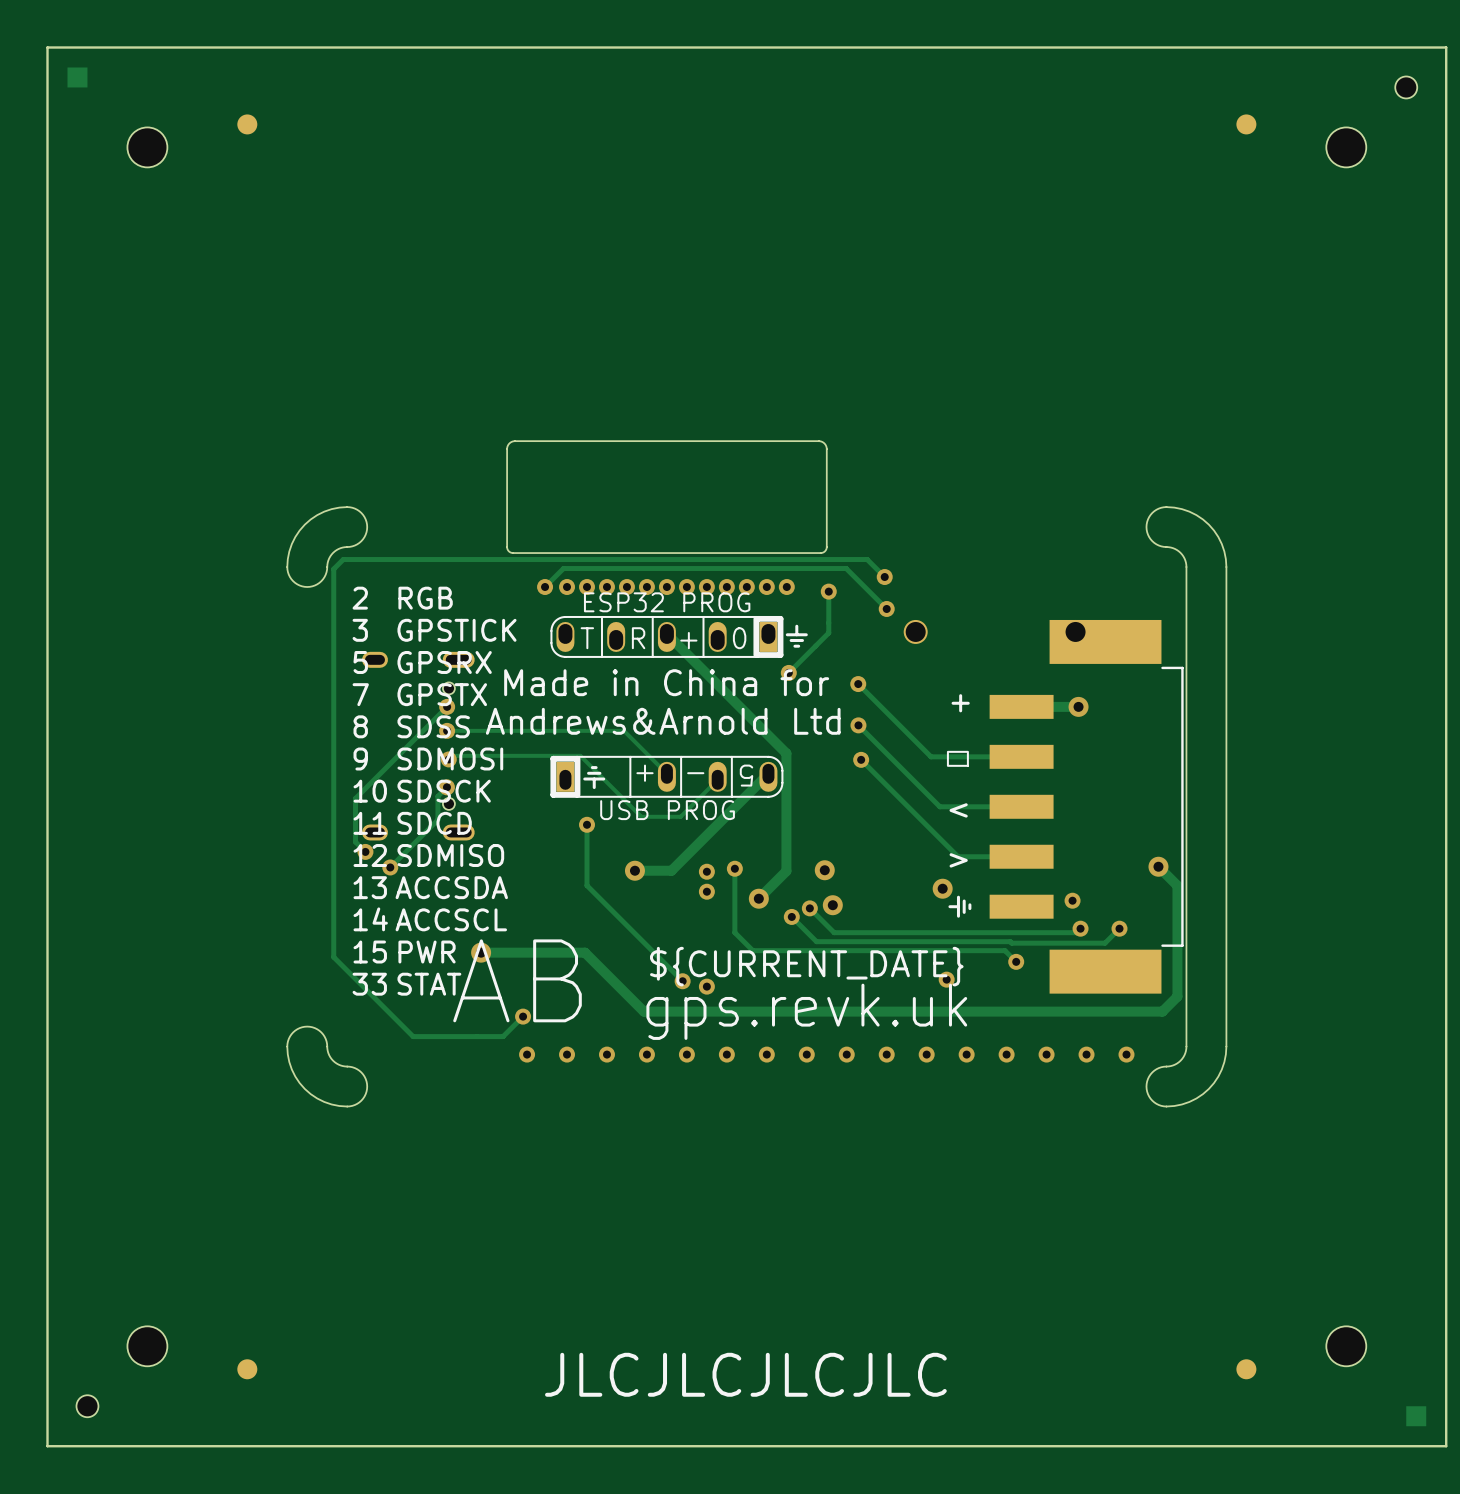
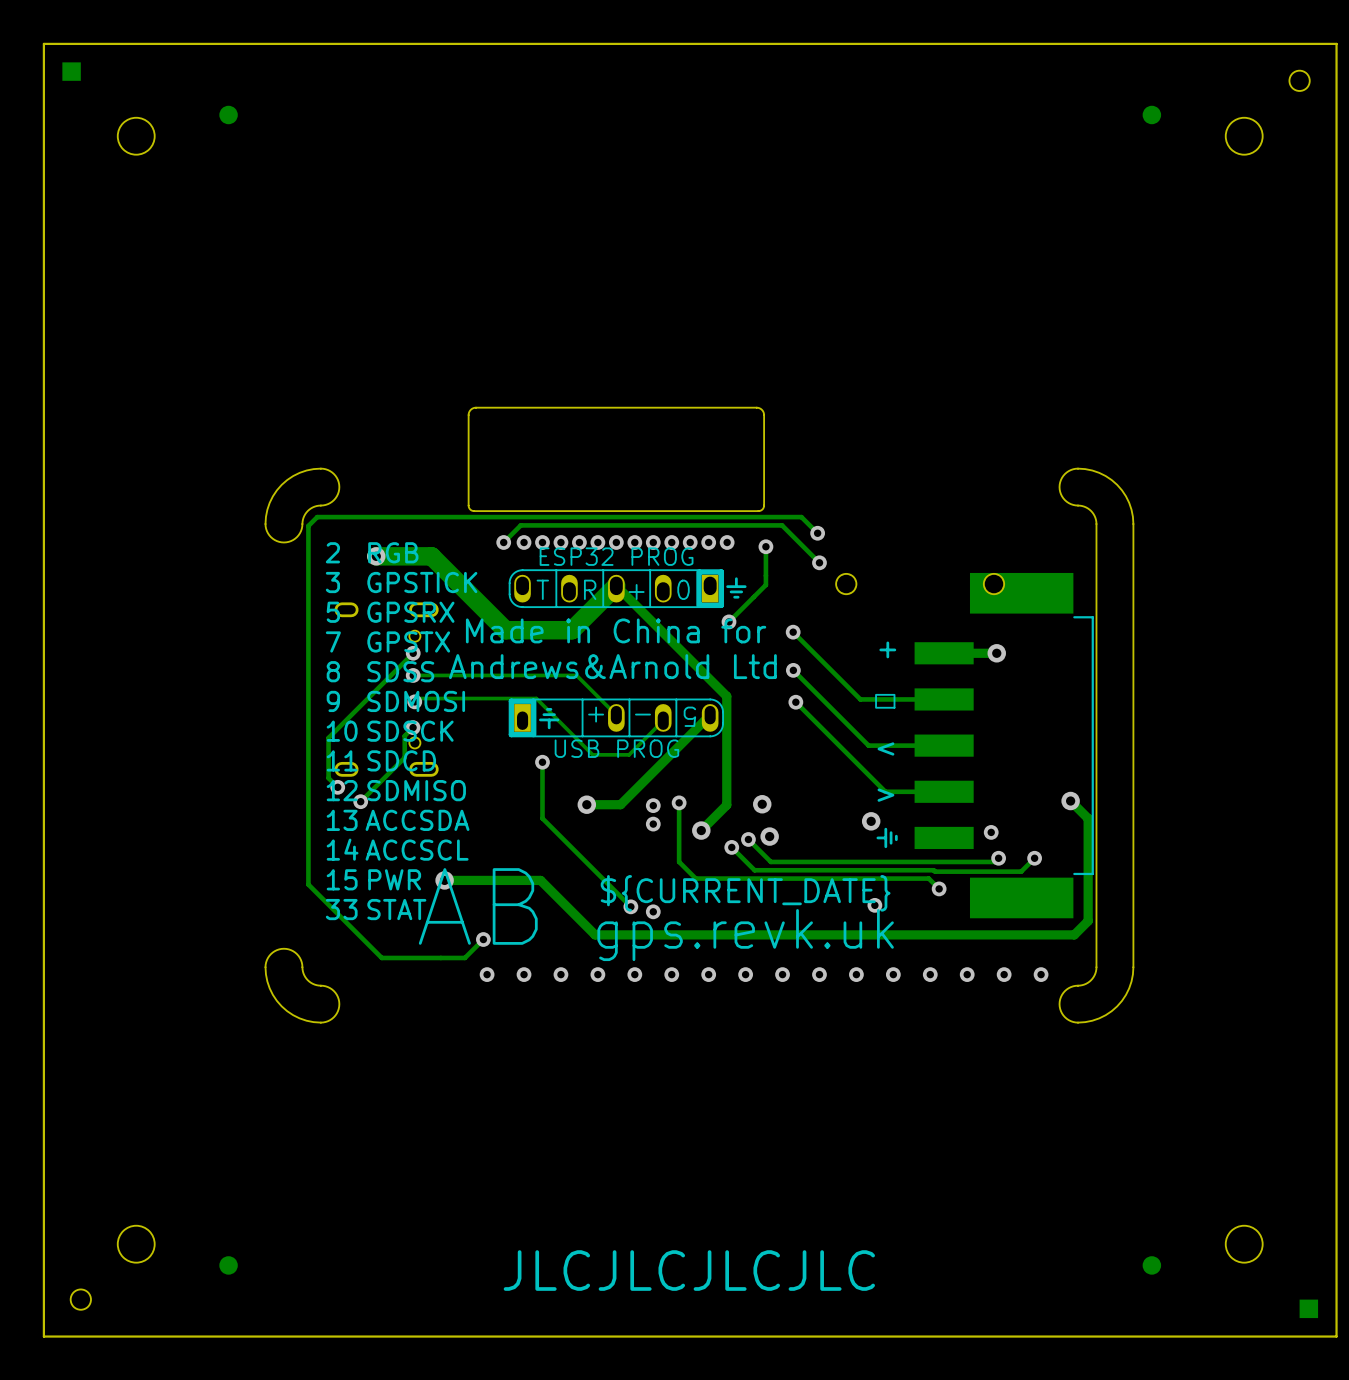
track: none -> (376, 556) (431, 556) (505, 630) (572, 630) (616, 585)
via: none -> (376, 556)

